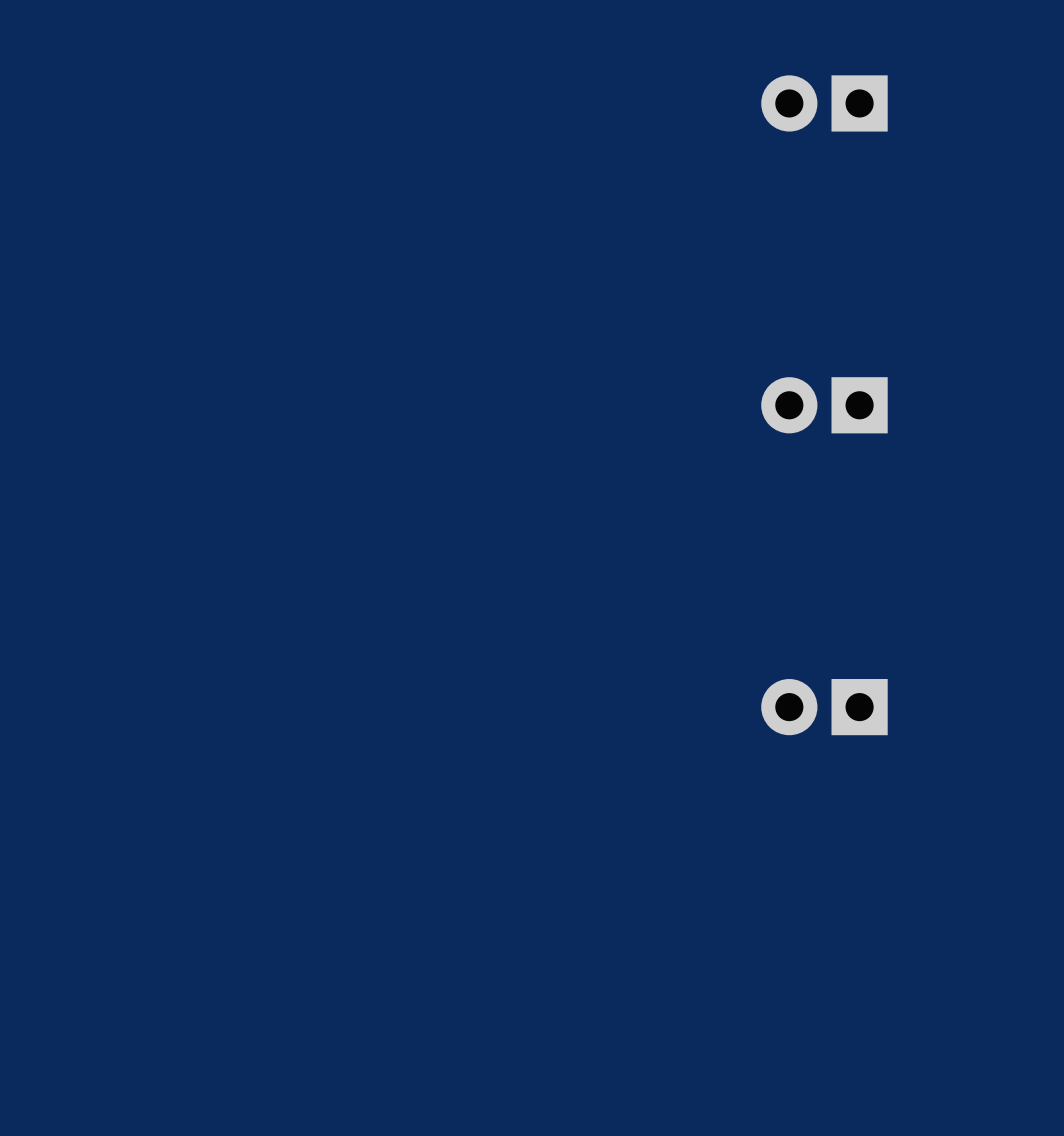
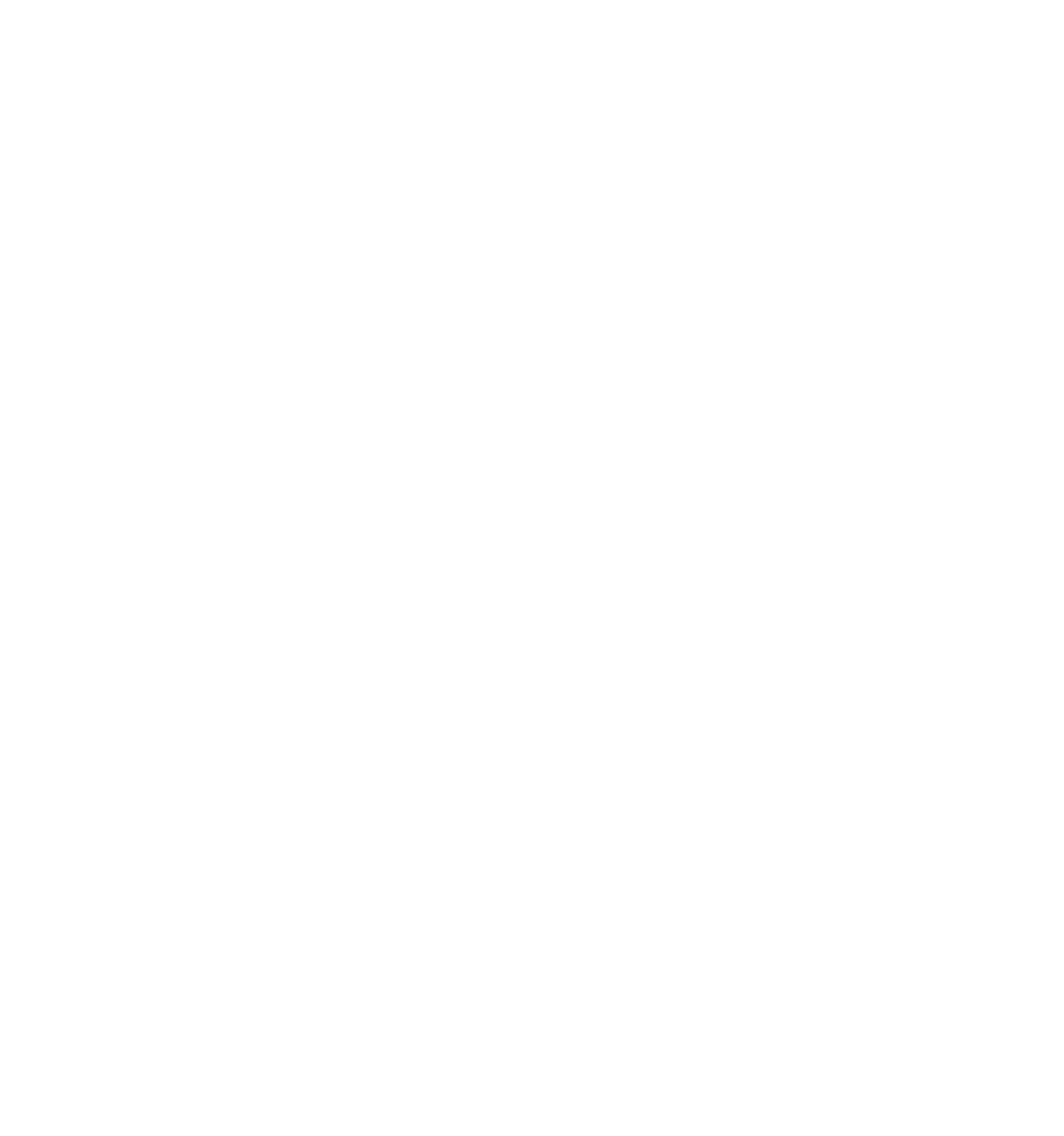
part: (824, 103) -> none
part: (824, 405) -> none
part: (824, 707) -> none

